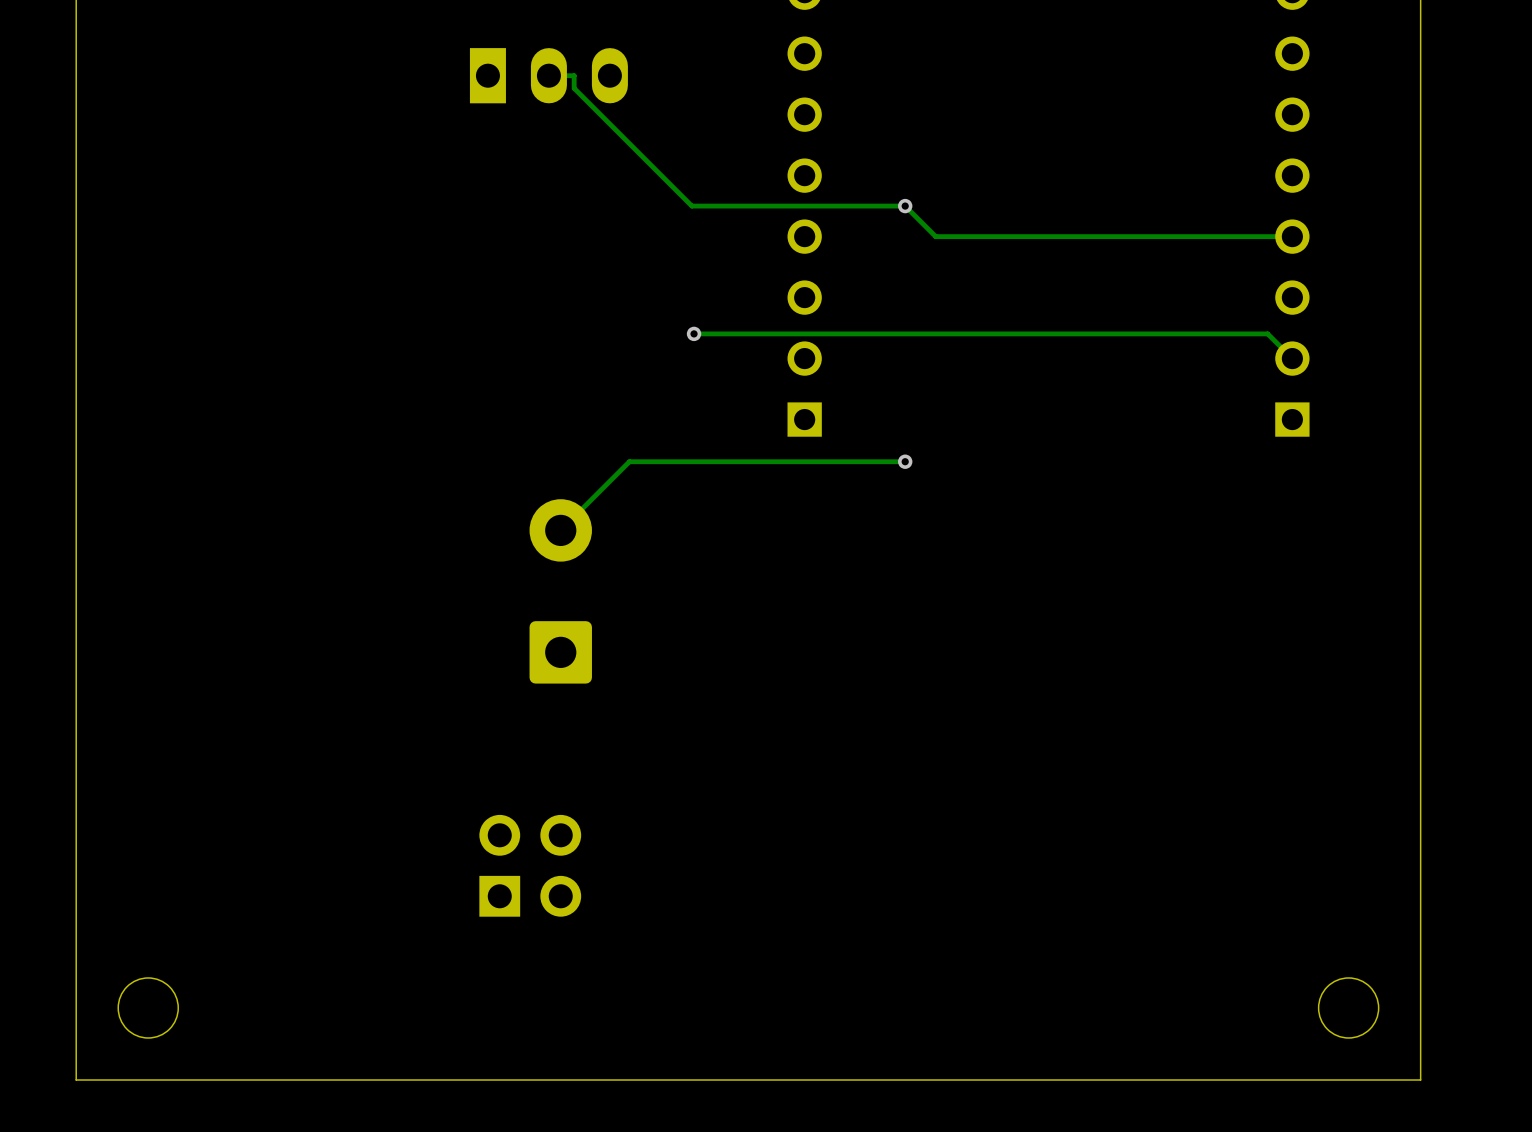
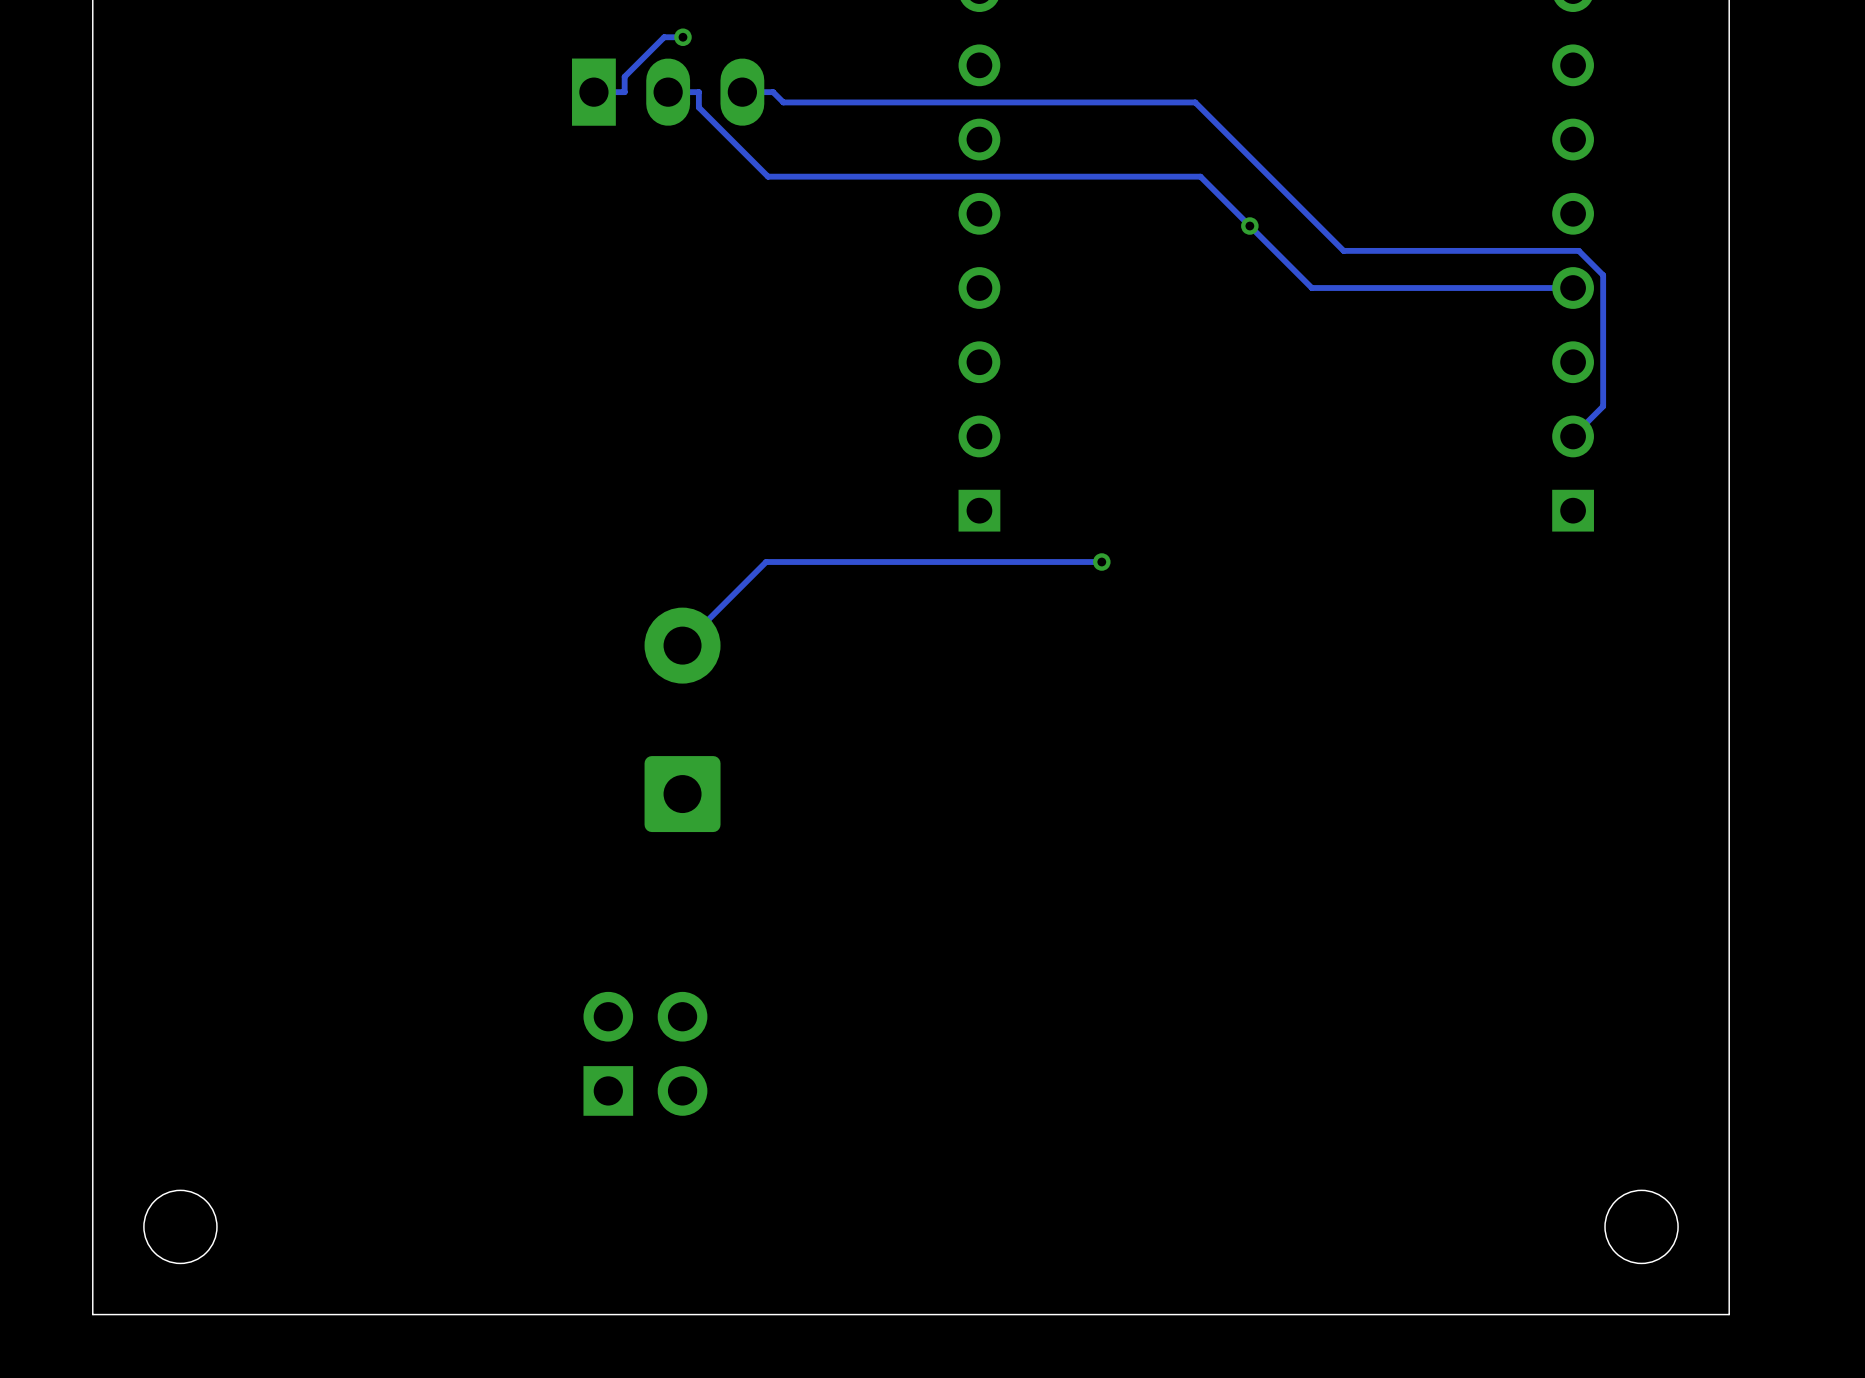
track: none -> (682, 37) (664, 37) (624, 76) (624, 92) (593, 92)
via: none -> (682, 37)
track: (630, 145) (691, 206) (905, 206) (935, 236) (1077, 236) -> (768, 176) (1200, 176) (1311, 288)
via position: (905, 206) -> (1249, 226)
track: (694, 333) (1267, 333) (1292, 358) -> (742, 92) (773, 92) (783, 102) (1195, 102) (1343, 250) (1578, 250) (1603, 275) (1603, 406) (1573, 436)
via: (694, 333) -> none

